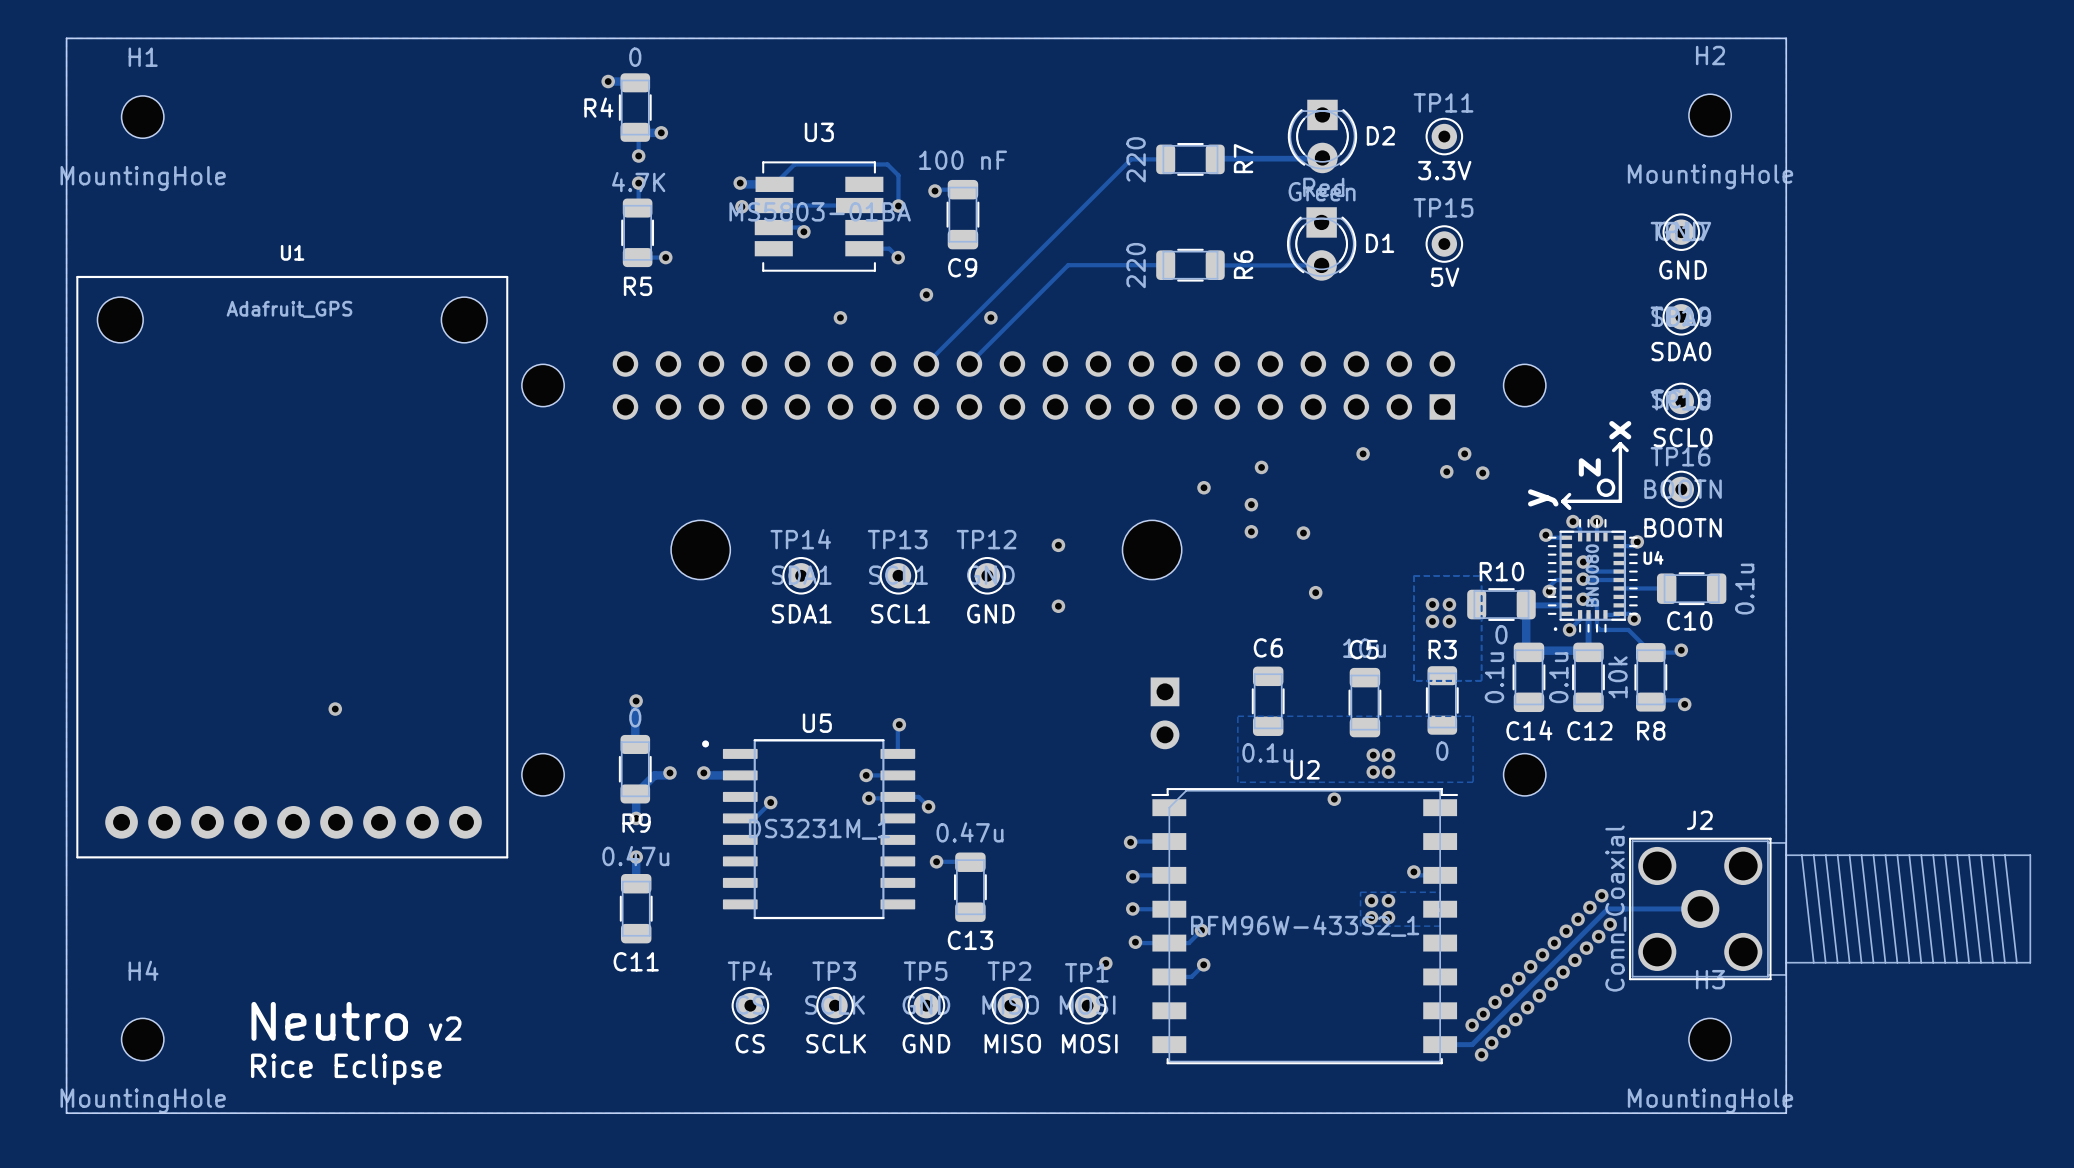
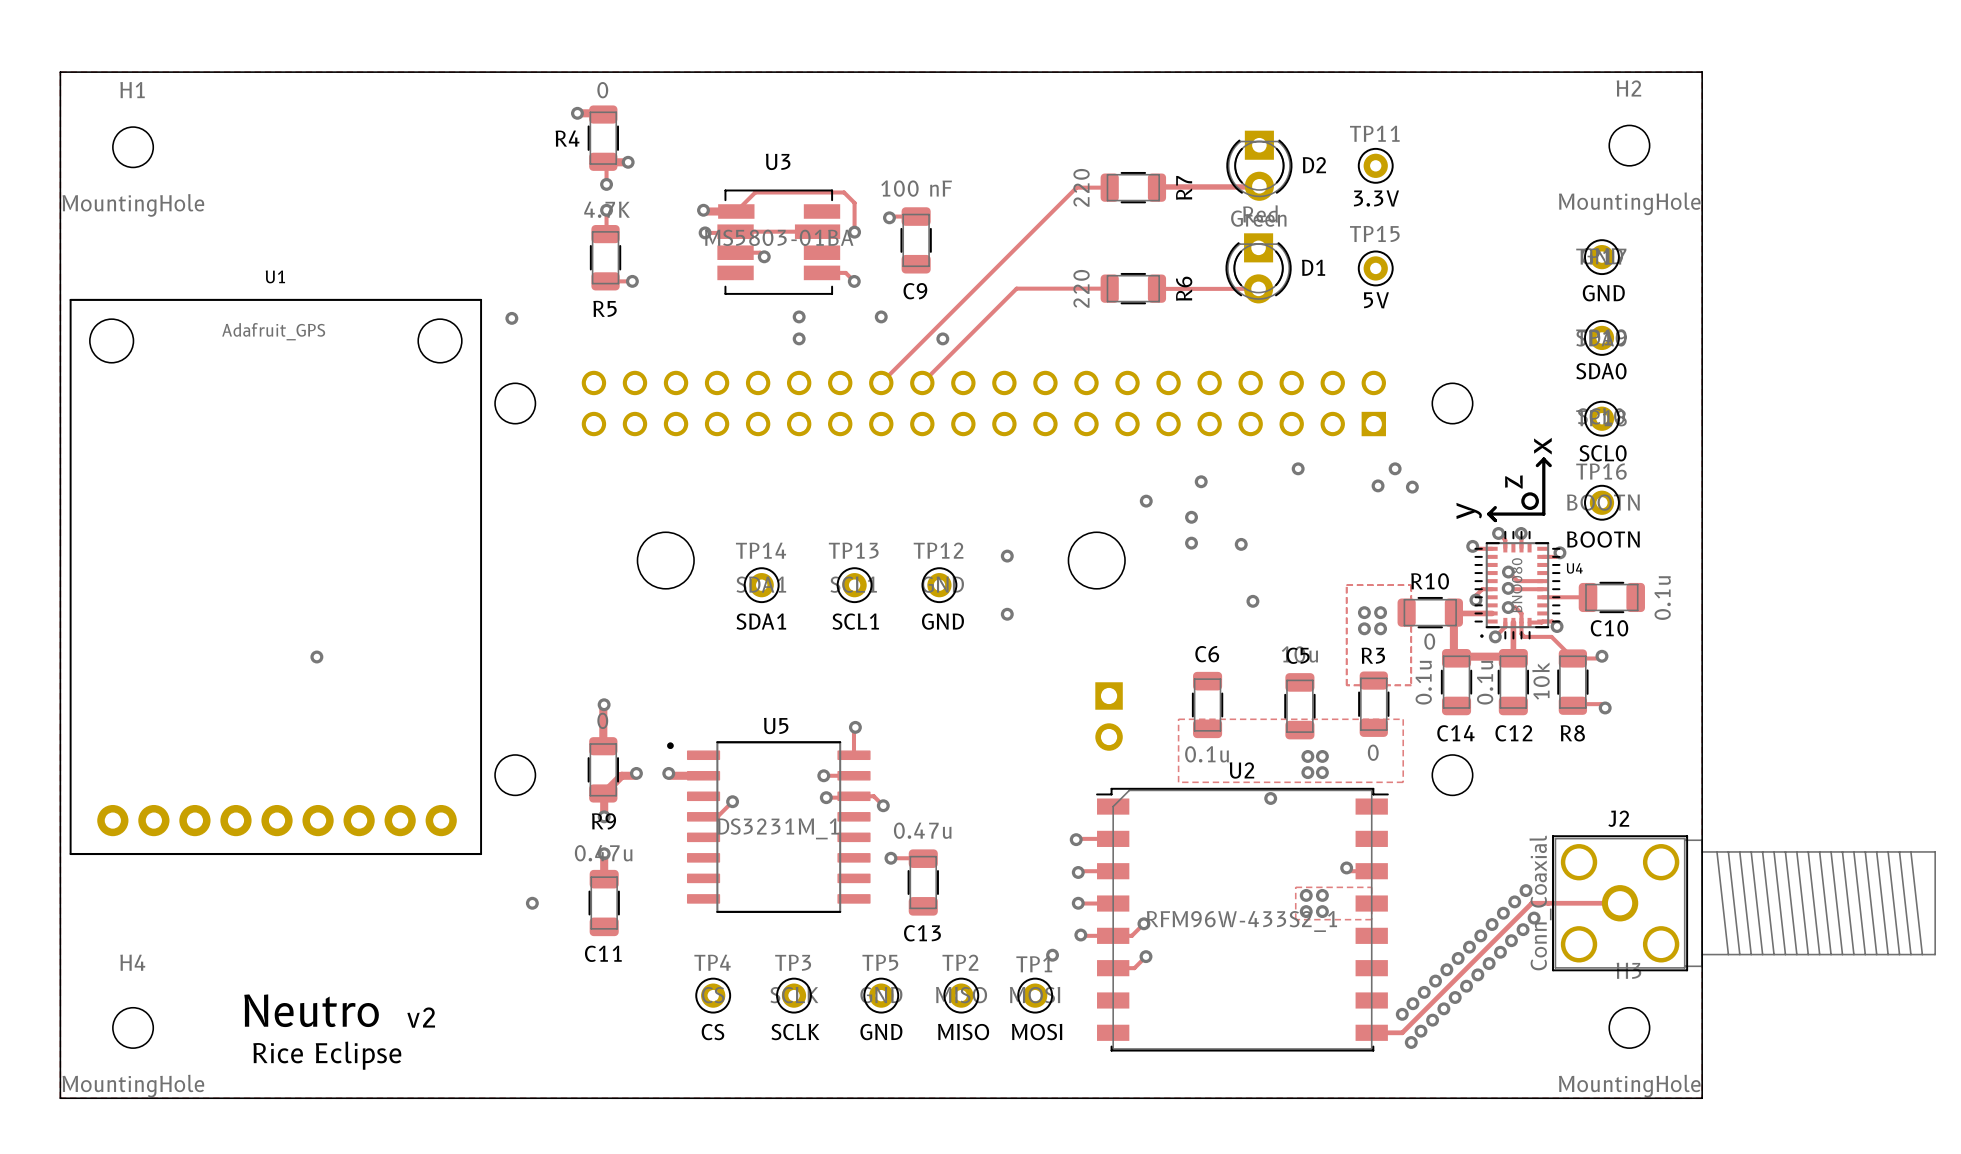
via: none -> (799, 316)
via: none -> (511, 318)
via position: (335, 709) -> (316, 656)
via: none -> (532, 903)

